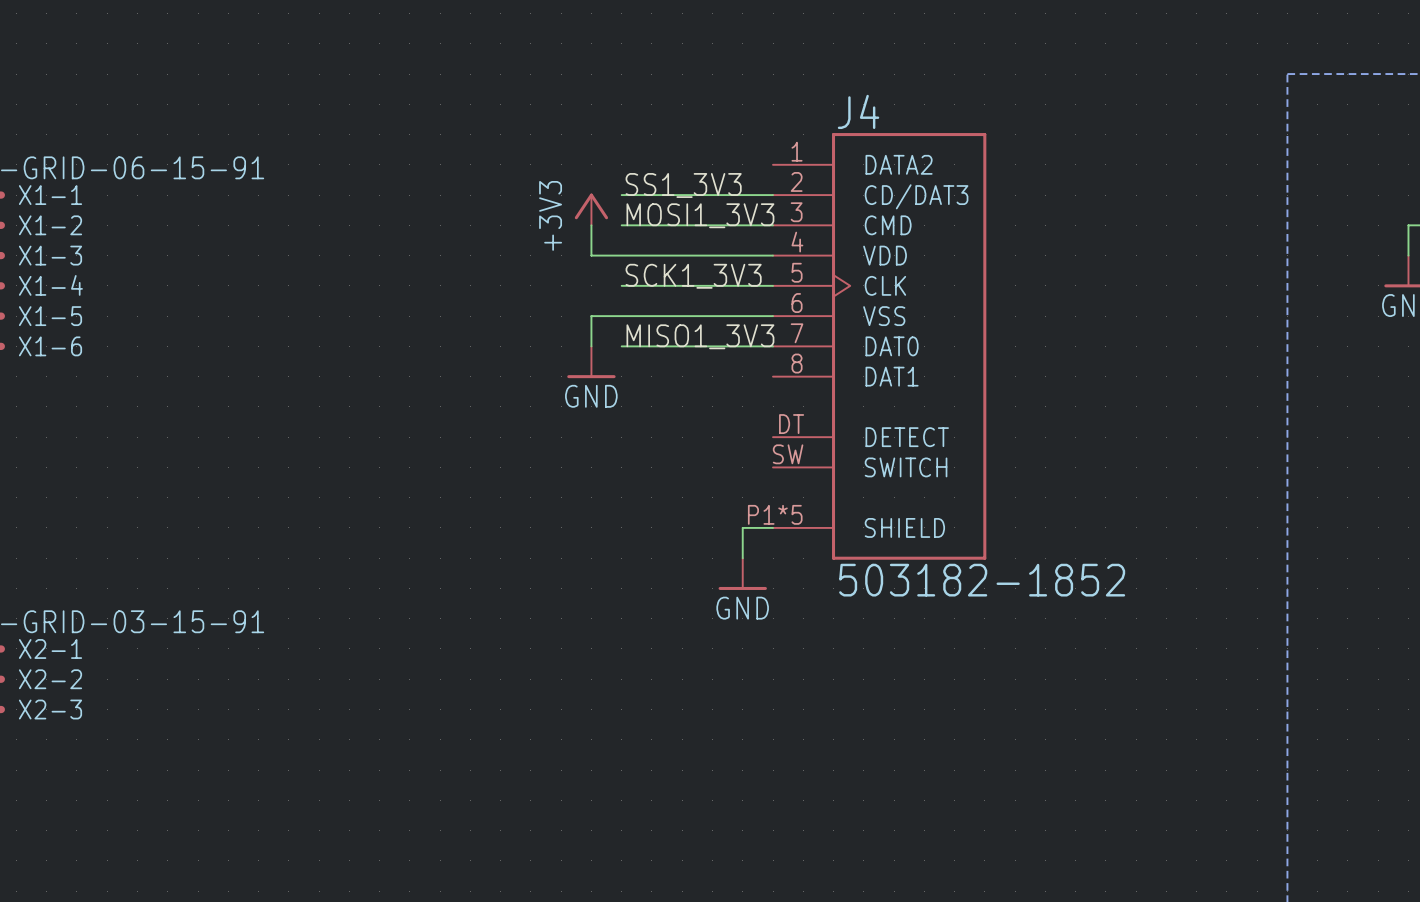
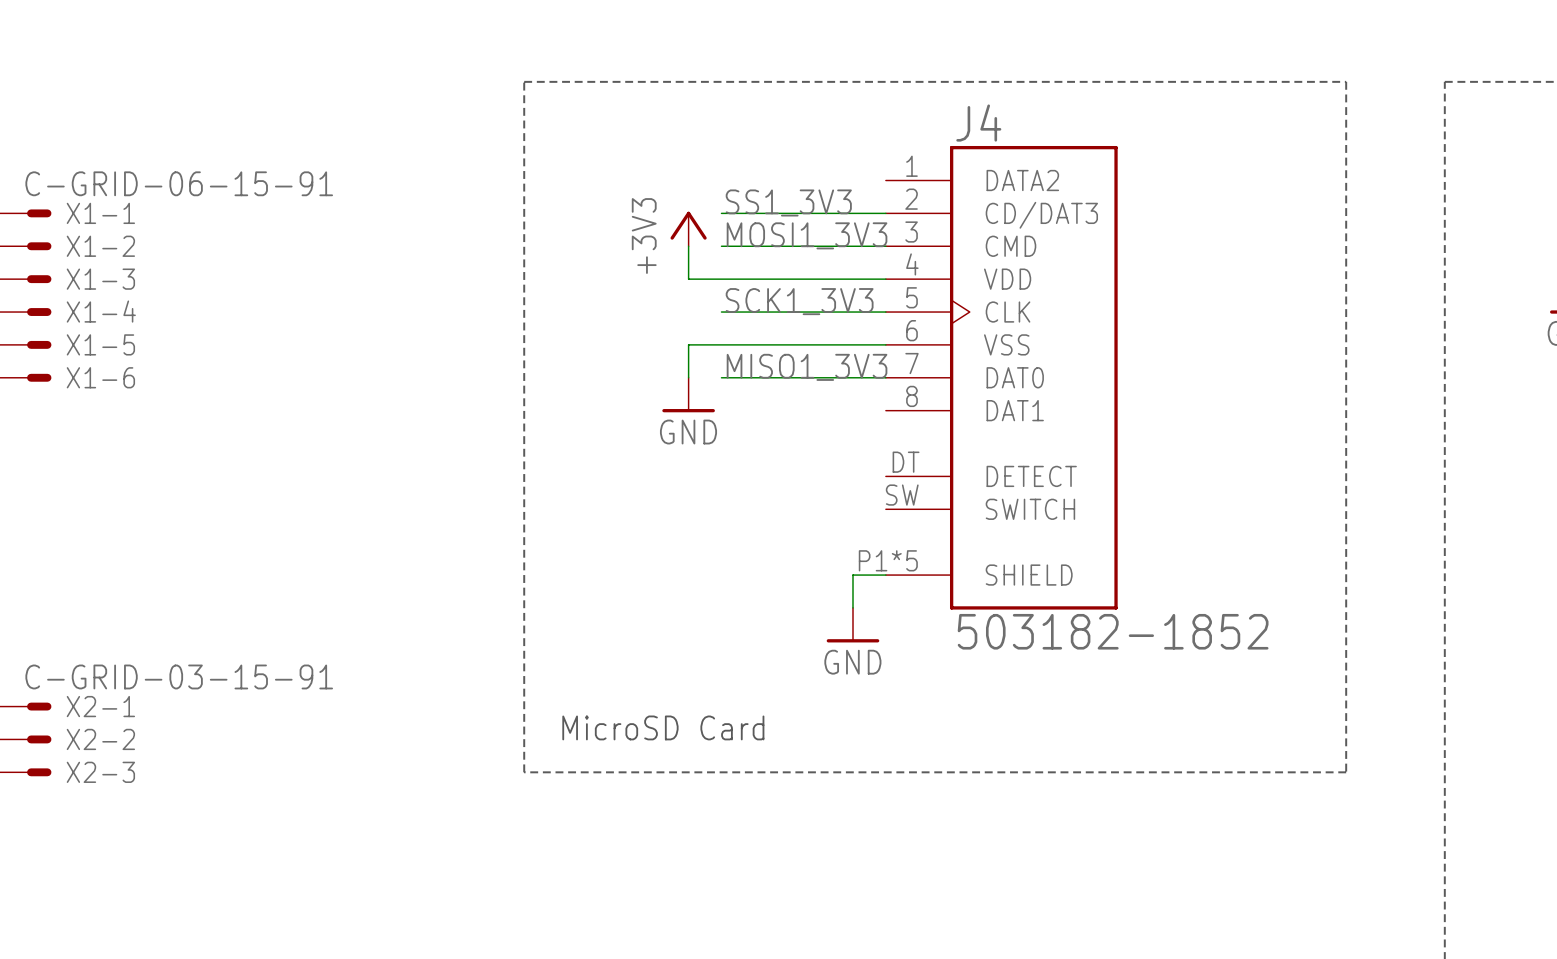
line: none -> (524, 81) (524, 772) (1346, 772) (1346, 81) (524, 81)
text: none -> MicroSD Card (663, 727)

